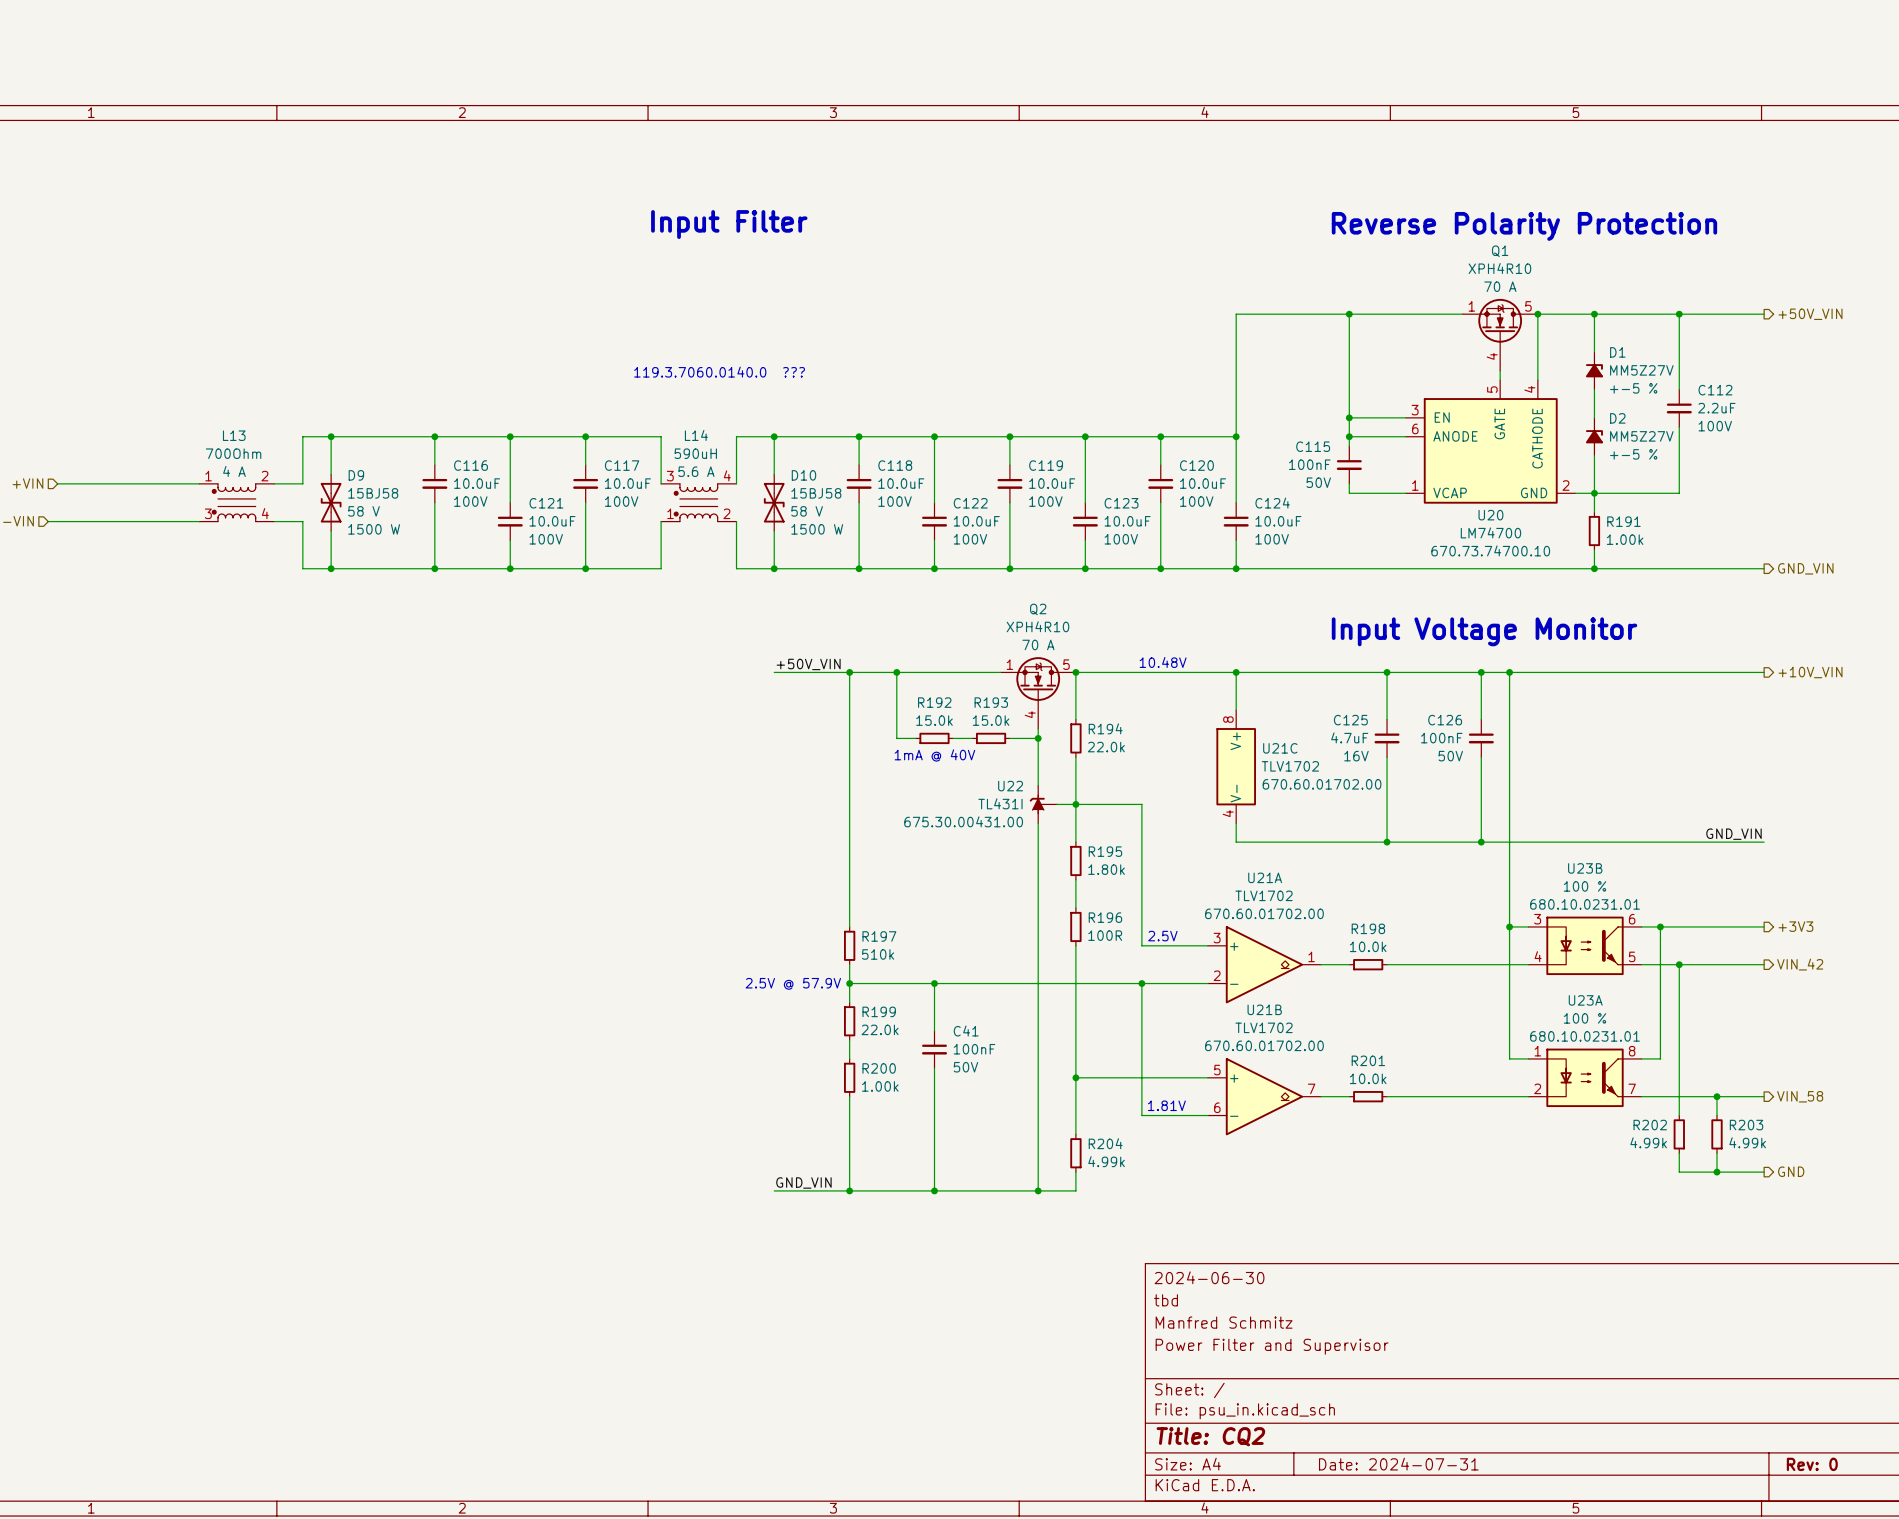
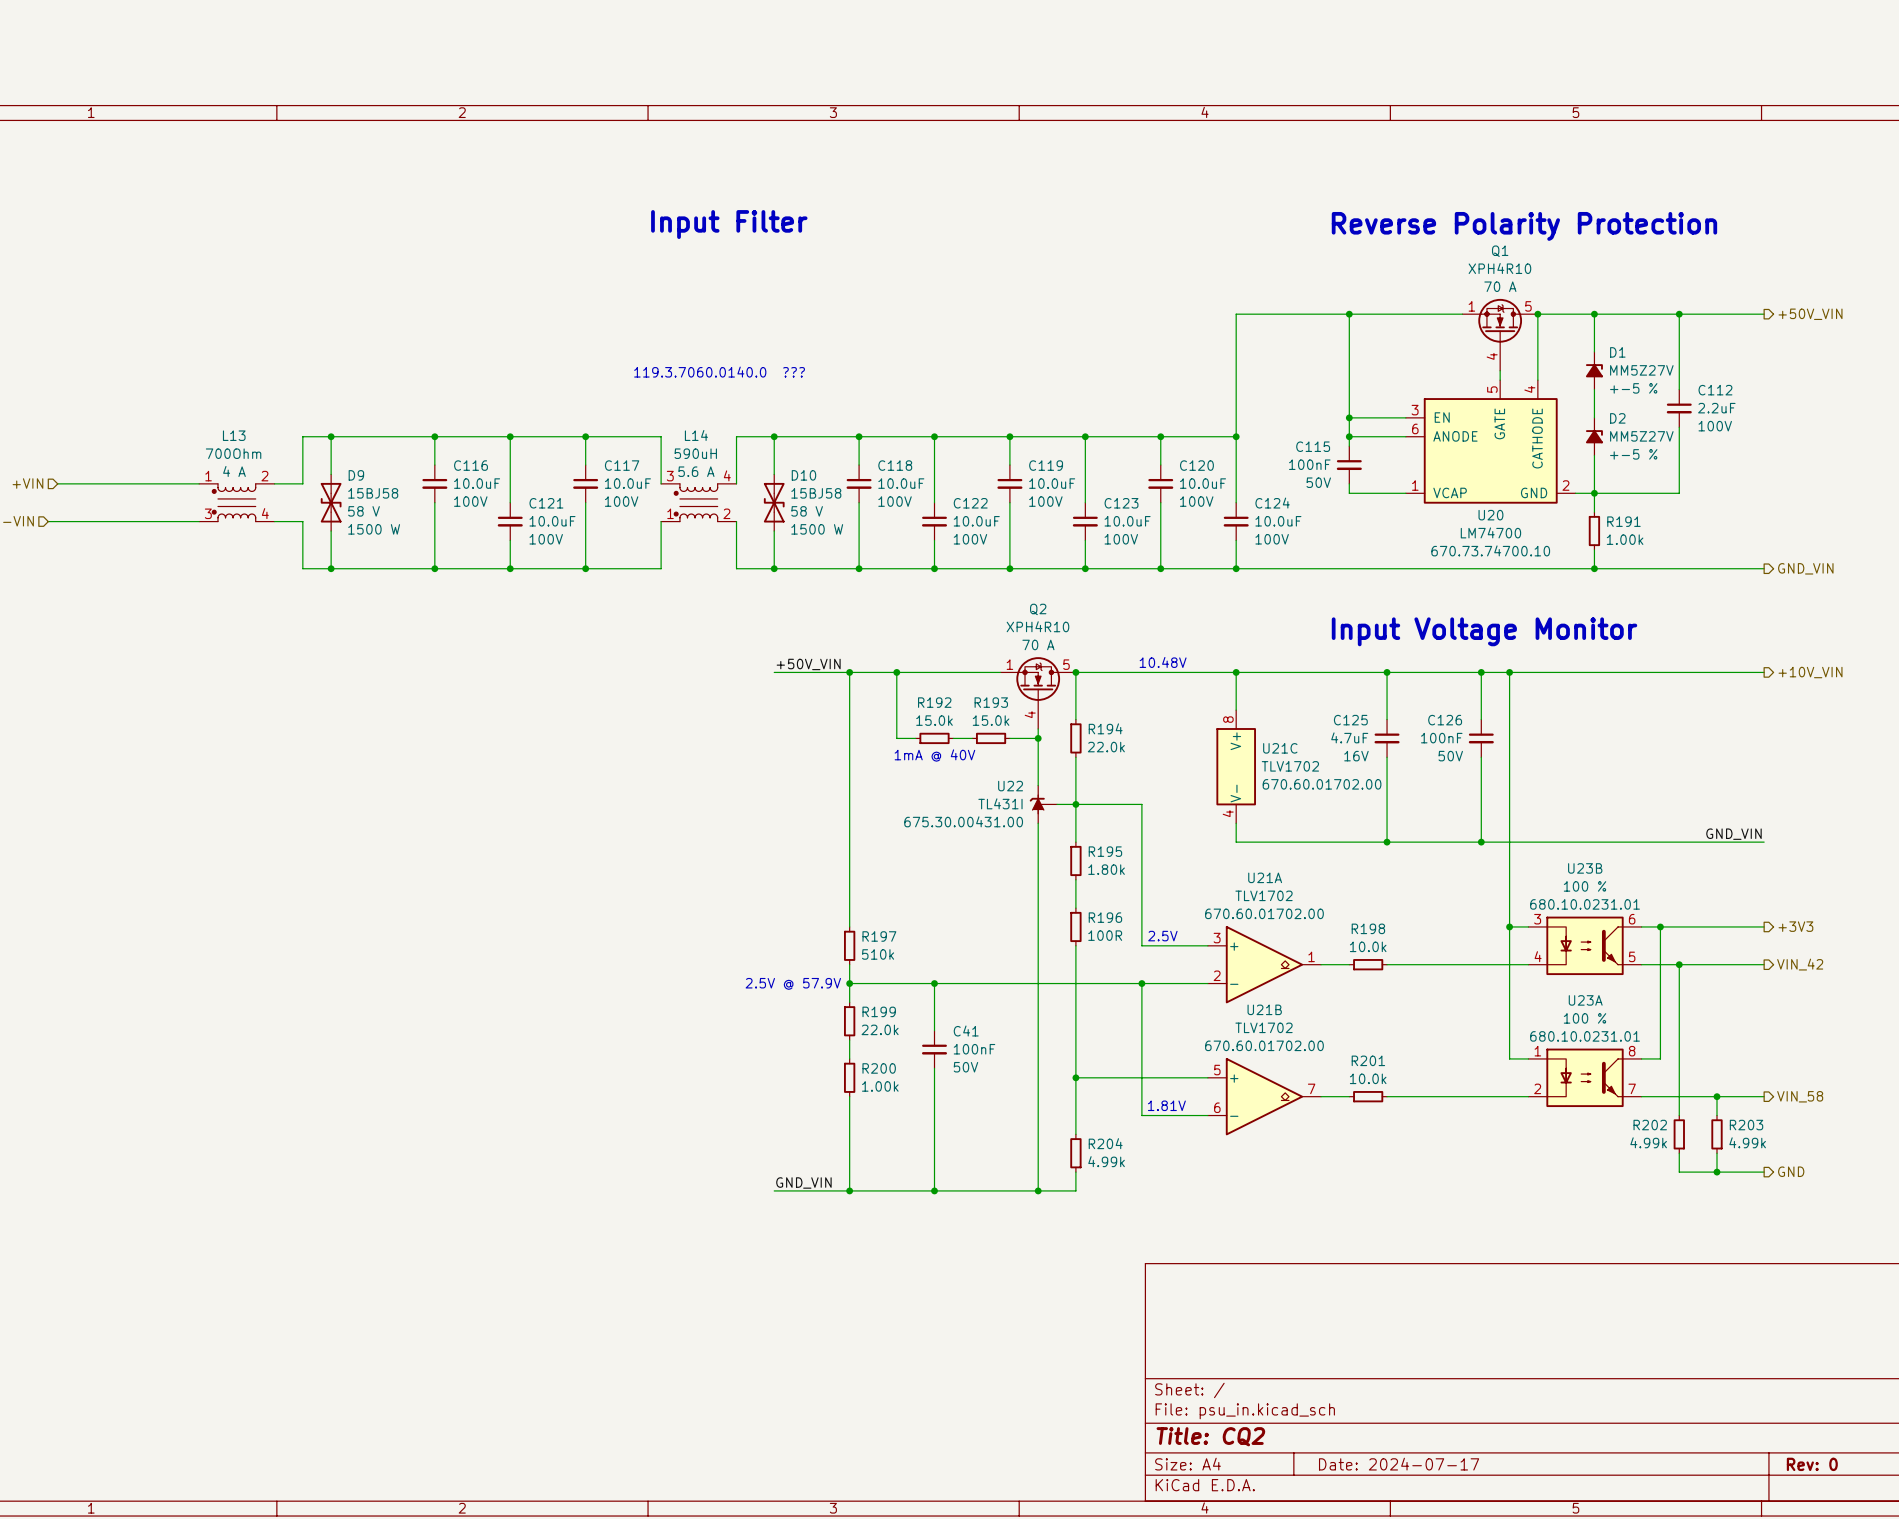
title block: 2024-06-30 (1209, 1277) -> none
title block: tbd (1166, 1300) -> none
title block: Manfred Schmitz (1224, 1322) -> none
title block: Power Filter and Supervisor (1272, 1346) -> none
title block: Date: 2024-07-31 (1398, 1464) -> Date: 2024-07-17 (1399, 1464)

